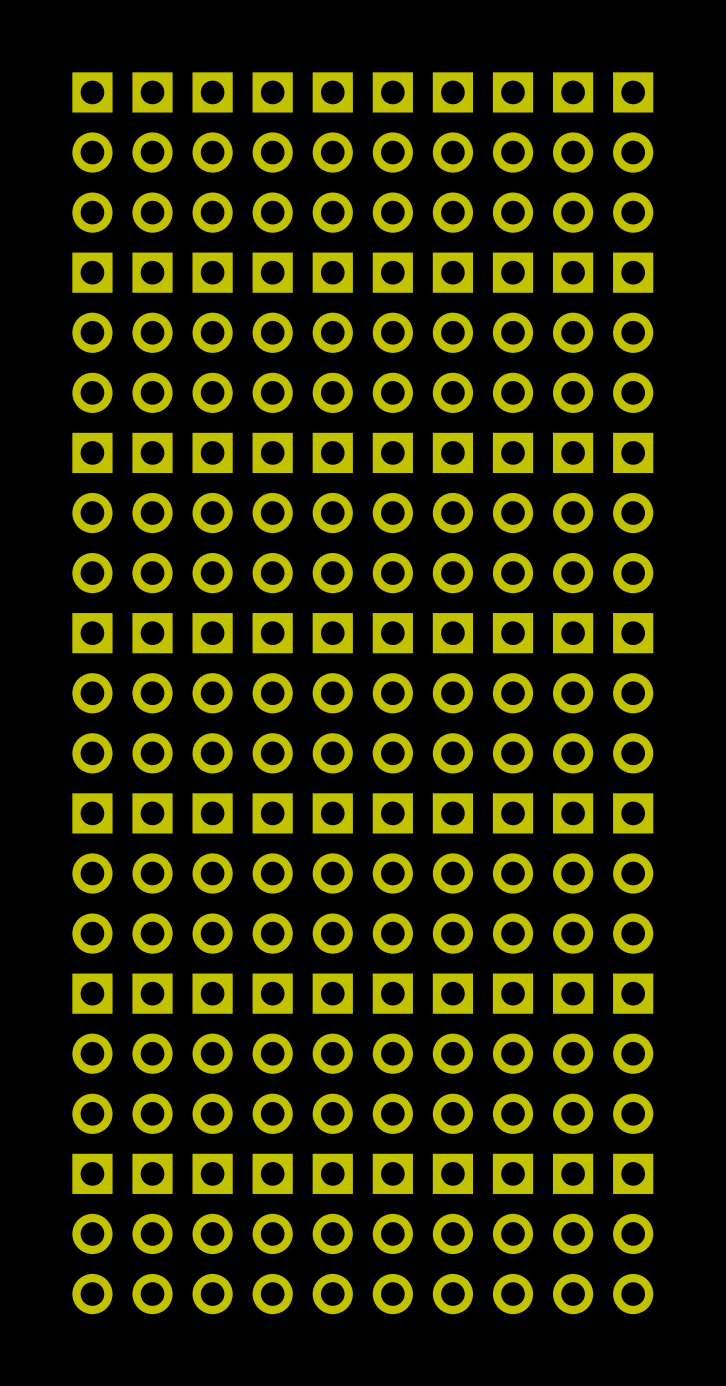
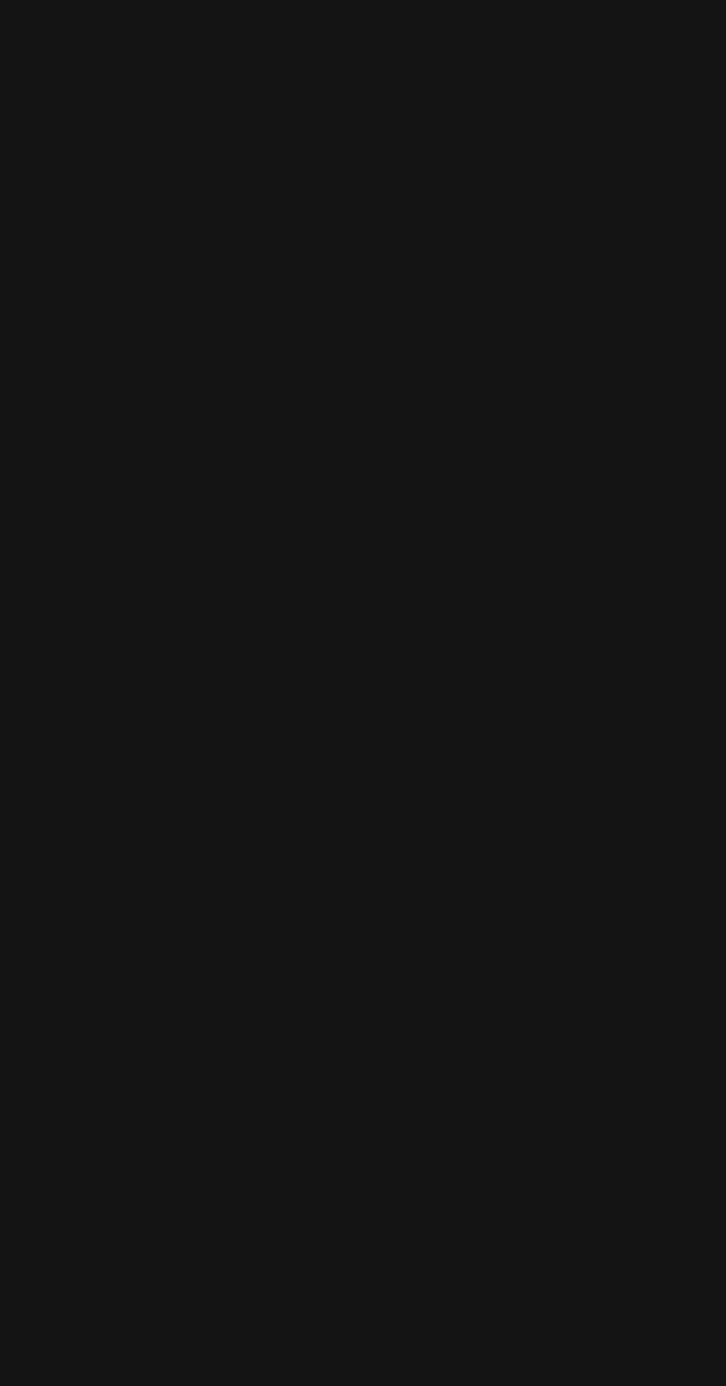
part: (92, 152) -> none
part: (152, 152) -> none
part: (212, 152) -> none
part: (272, 152) -> none
part: (332, 152) -> none
part: (392, 152) -> none
part: (452, 152) -> none
part: (513, 152) -> none
part: (573, 152) -> none
part: (633, 152) -> none
part: (92, 332) -> none
part: (152, 332) -> none
part: (212, 332) -> none
part: (272, 332) -> none
part: (332, 332) -> none
part: (392, 332) -> none
part: (452, 332) -> none
part: (513, 332) -> none
part: (573, 332) -> none
part: (633, 332) -> none
part: (92, 513) -> none
part: (152, 513) -> none
part: (212, 513) -> none
part: (272, 513) -> none
part: (332, 513) -> none
part: (392, 513) -> none
part: (452, 513) -> none
part: (513, 513) -> none
part: (573, 513) -> none
part: (633, 513) -> none
part: (92, 693) -> none
part: (152, 693) -> none
part: (212, 693) -> none
part: (272, 693) -> none
part: (332, 693) -> none
part: (392, 693) -> none
part: (452, 693) -> none
part: (513, 693) -> none
part: (573, 693) -> none
part: (633, 693) -> none
part: (92, 873) -> none
part: (152, 873) -> none
part: (212, 873) -> none
part: (272, 873) -> none
part: (332, 873) -> none
part: (392, 873) -> none
part: (452, 873) -> none
part: (513, 873) -> none
part: (573, 873) -> none
part: (633, 873) -> none
part: (92, 1053) -> none
part: (152, 1053) -> none
part: (212, 1053) -> none
part: (272, 1053) -> none
part: (332, 1053) -> none
part: (392, 1053) -> none
part: (452, 1053) -> none
part: (513, 1053) -> none
part: (573, 1053) -> none
part: (633, 1053) -> none
part: (92, 1233) -> none
part: (152, 1233) -> none
part: (212, 1233) -> none
part: (272, 1233) -> none
part: (332, 1233) -> none
part: (392, 1233) -> none
part: (452, 1233) -> none
part: (513, 1233) -> none
part: (573, 1233) -> none
part: (633, 1233) -> none

